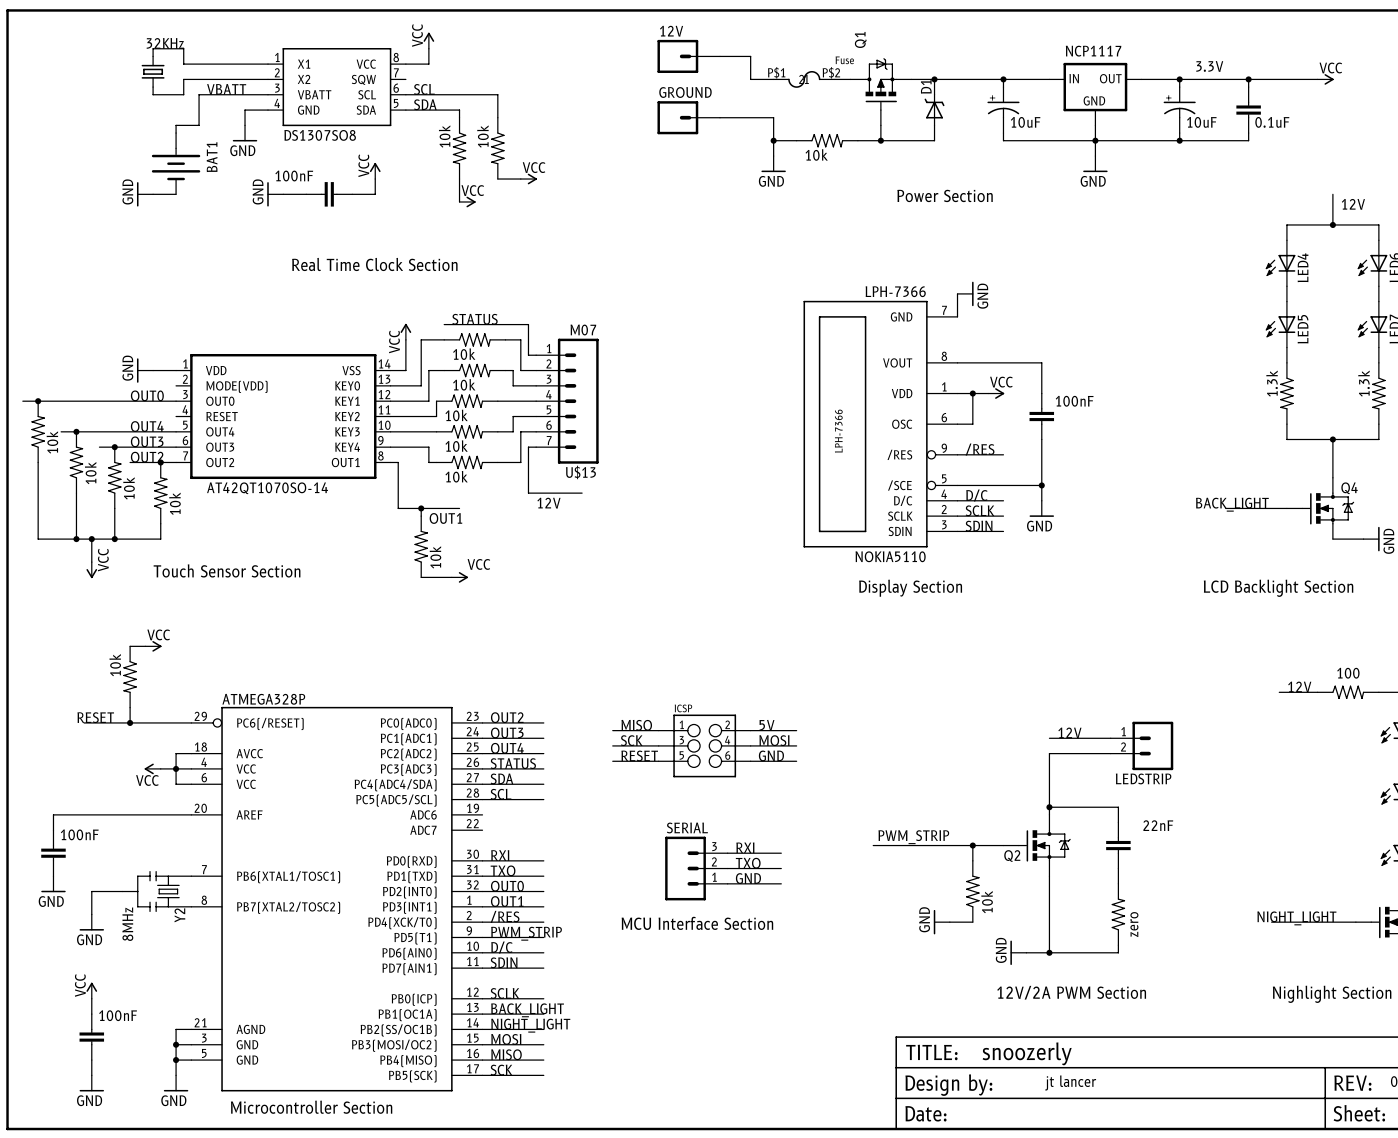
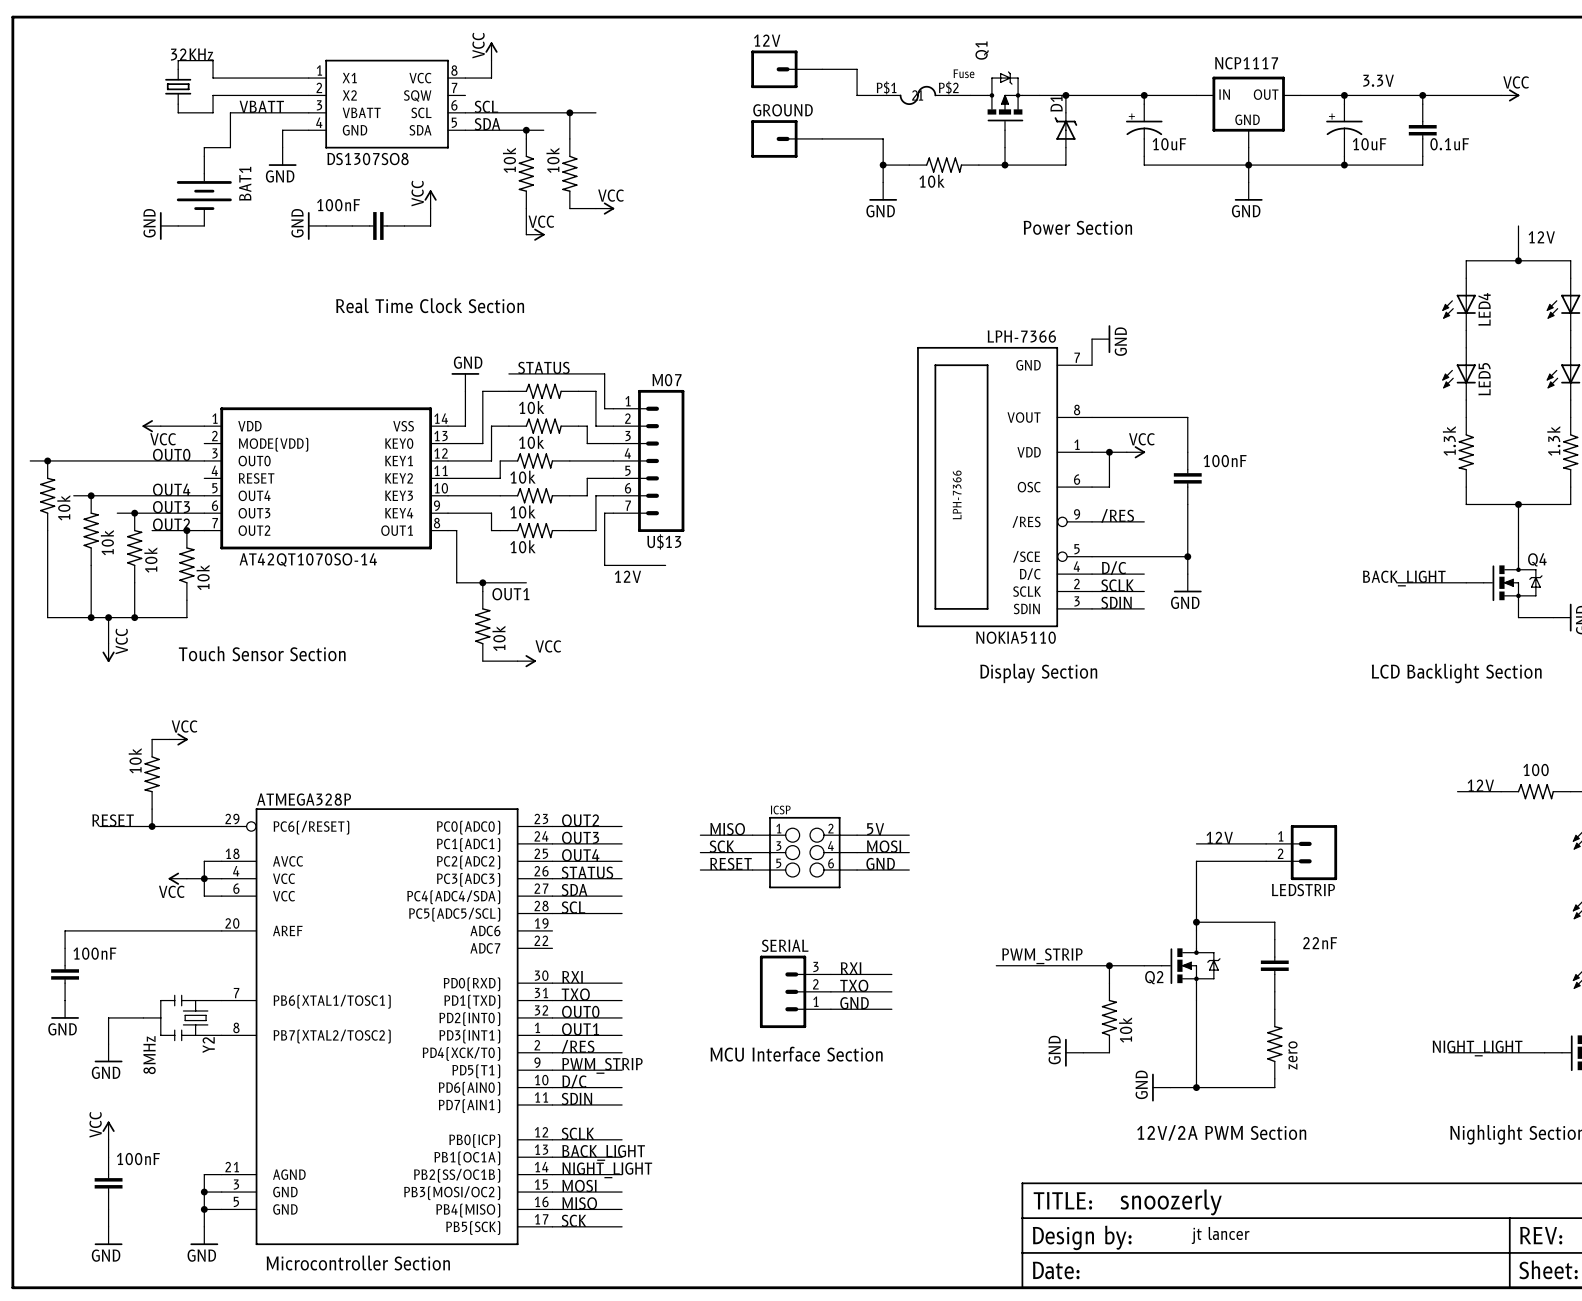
wire: none -> (569, 112) (595, 112)
junction: none -> (569, 112)
wire: none -> (526, 130) (543, 130)
junction: none -> (526, 130)
power symbol: VCC (405, 331) -> GND (465, 382)
power symbol: none -> VCC (151, 426)
power symbol: GND (145, 370) -> none

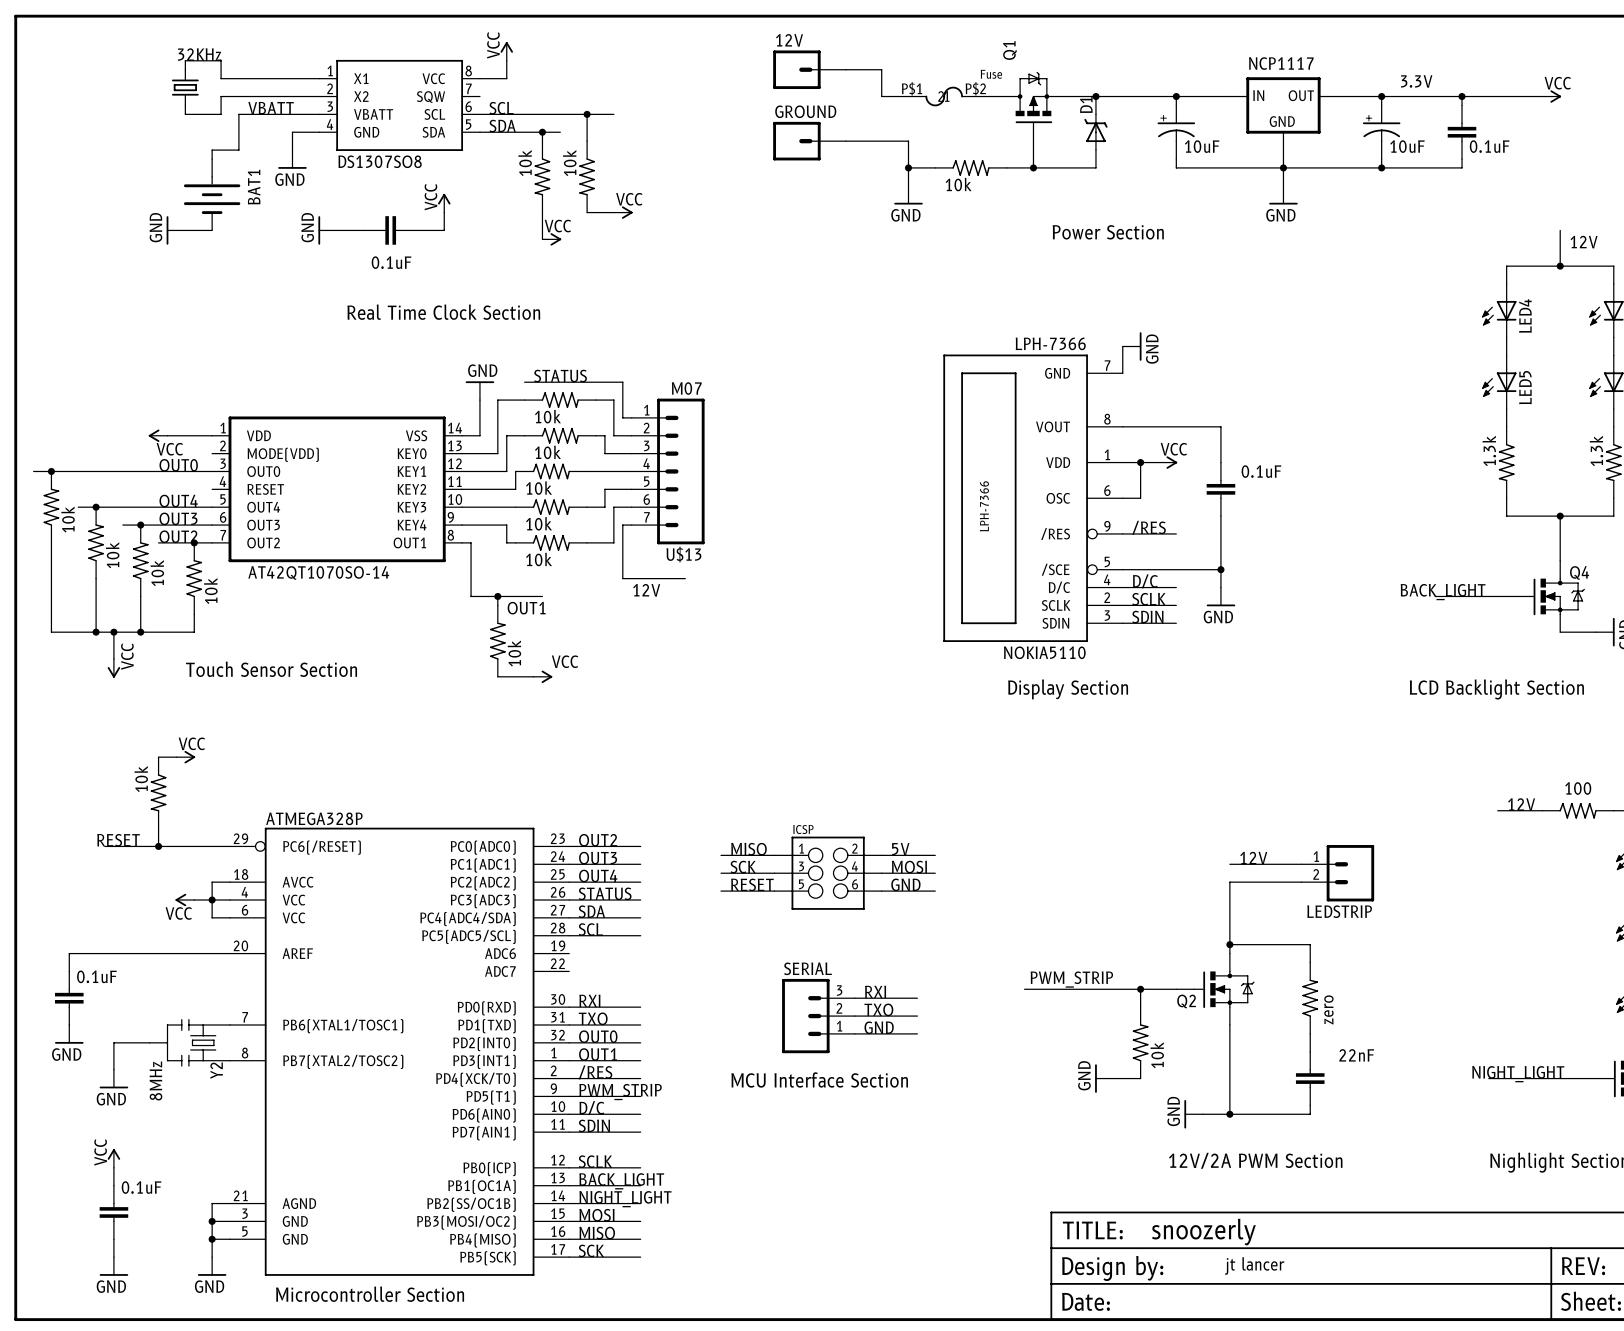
part value: 100nF (338, 205) -> 0.1uF (391, 262)
part value: 100nF (1225, 461) -> 0.1uF (1261, 471)
part value: 100nF (94, 953) -> 0.1uF (96, 976)
part position: (1274, 965) -> (1310, 1078)
part position: (1274, 1044) -> (1310, 998)
part value: 100nF (138, 1159) -> 0.1uF (141, 1187)

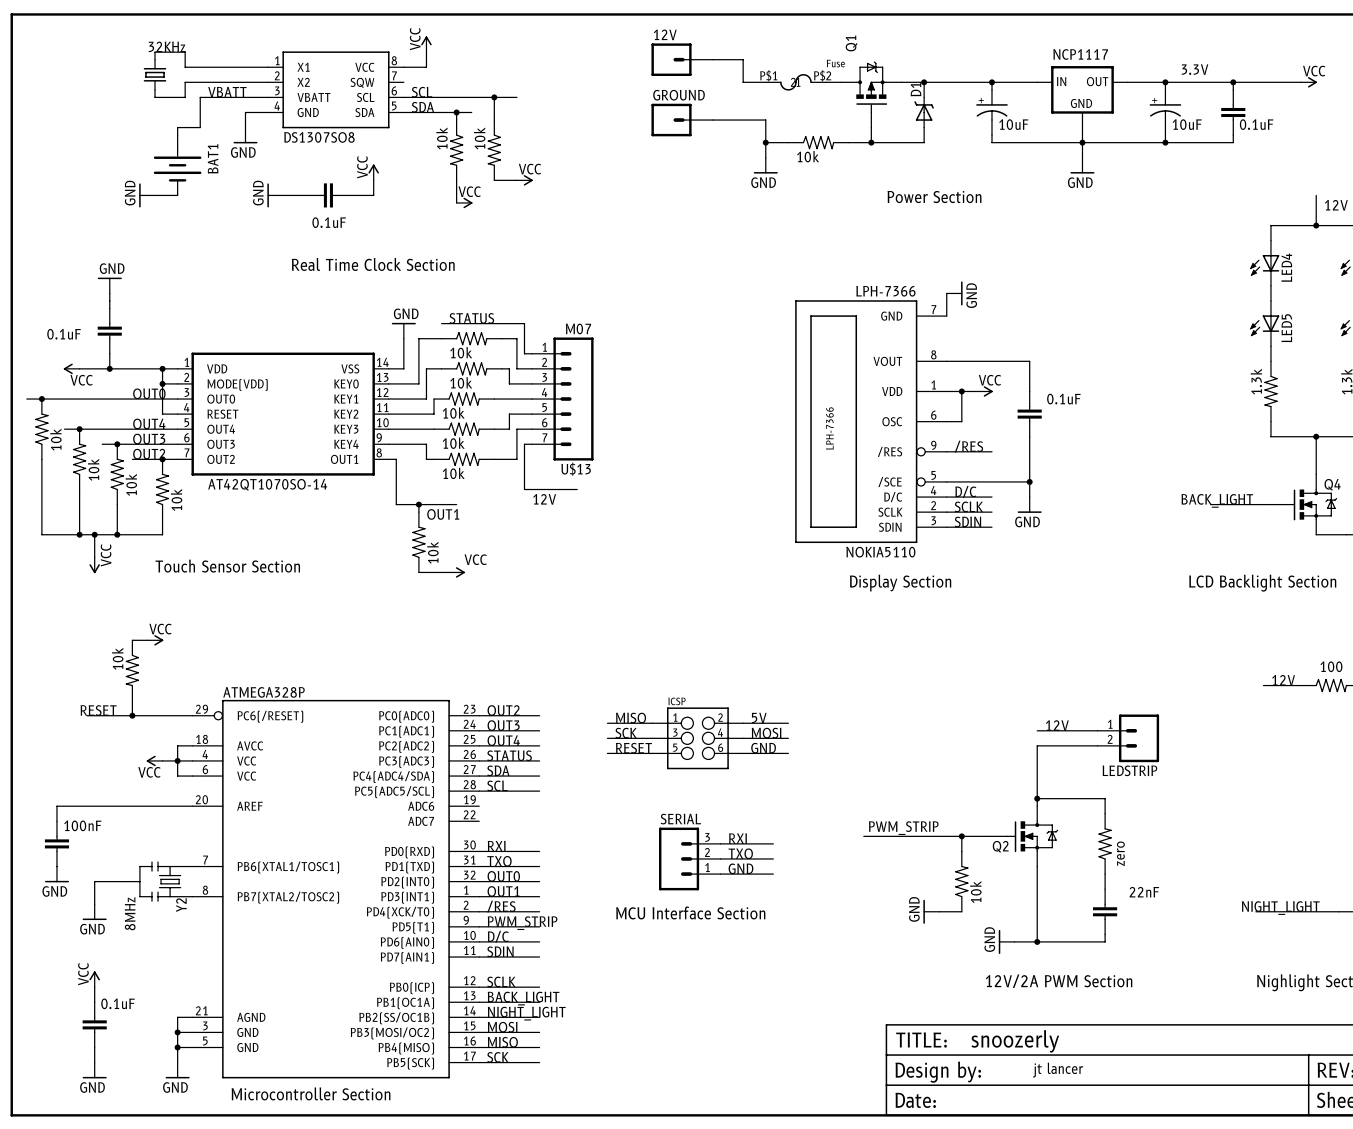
power symbol: none -> GND (109, 285)
wire: none -> (109, 293) (109, 308)
part: none -> 0.1uF (109, 331)
wire: none -> (109, 353) (109, 368)
wire: none -> (79, 368) (139, 368)
junction: none -> (109, 368)
power symbol position: VCC (158, 435) -> VCC (71, 368)
wire: none -> (162, 368) (162, 414) (177, 414)
junction: none -> (162, 368)
wire: none -> (162, 383) (177, 383)
junction: none -> (162, 383)
part value: 0.1uF (96, 976) -> 100nF (82, 825)

